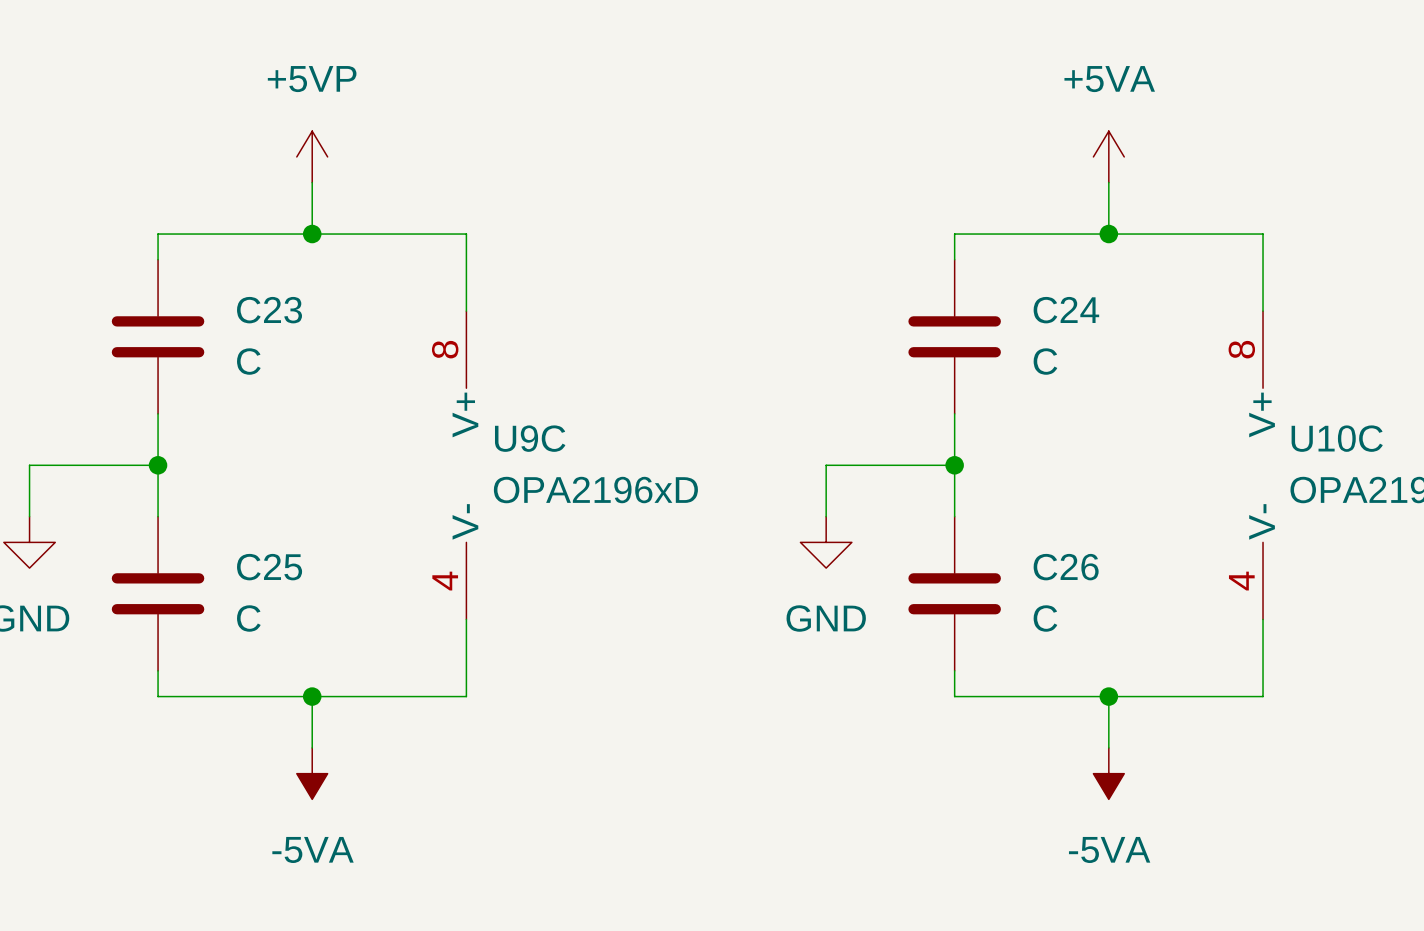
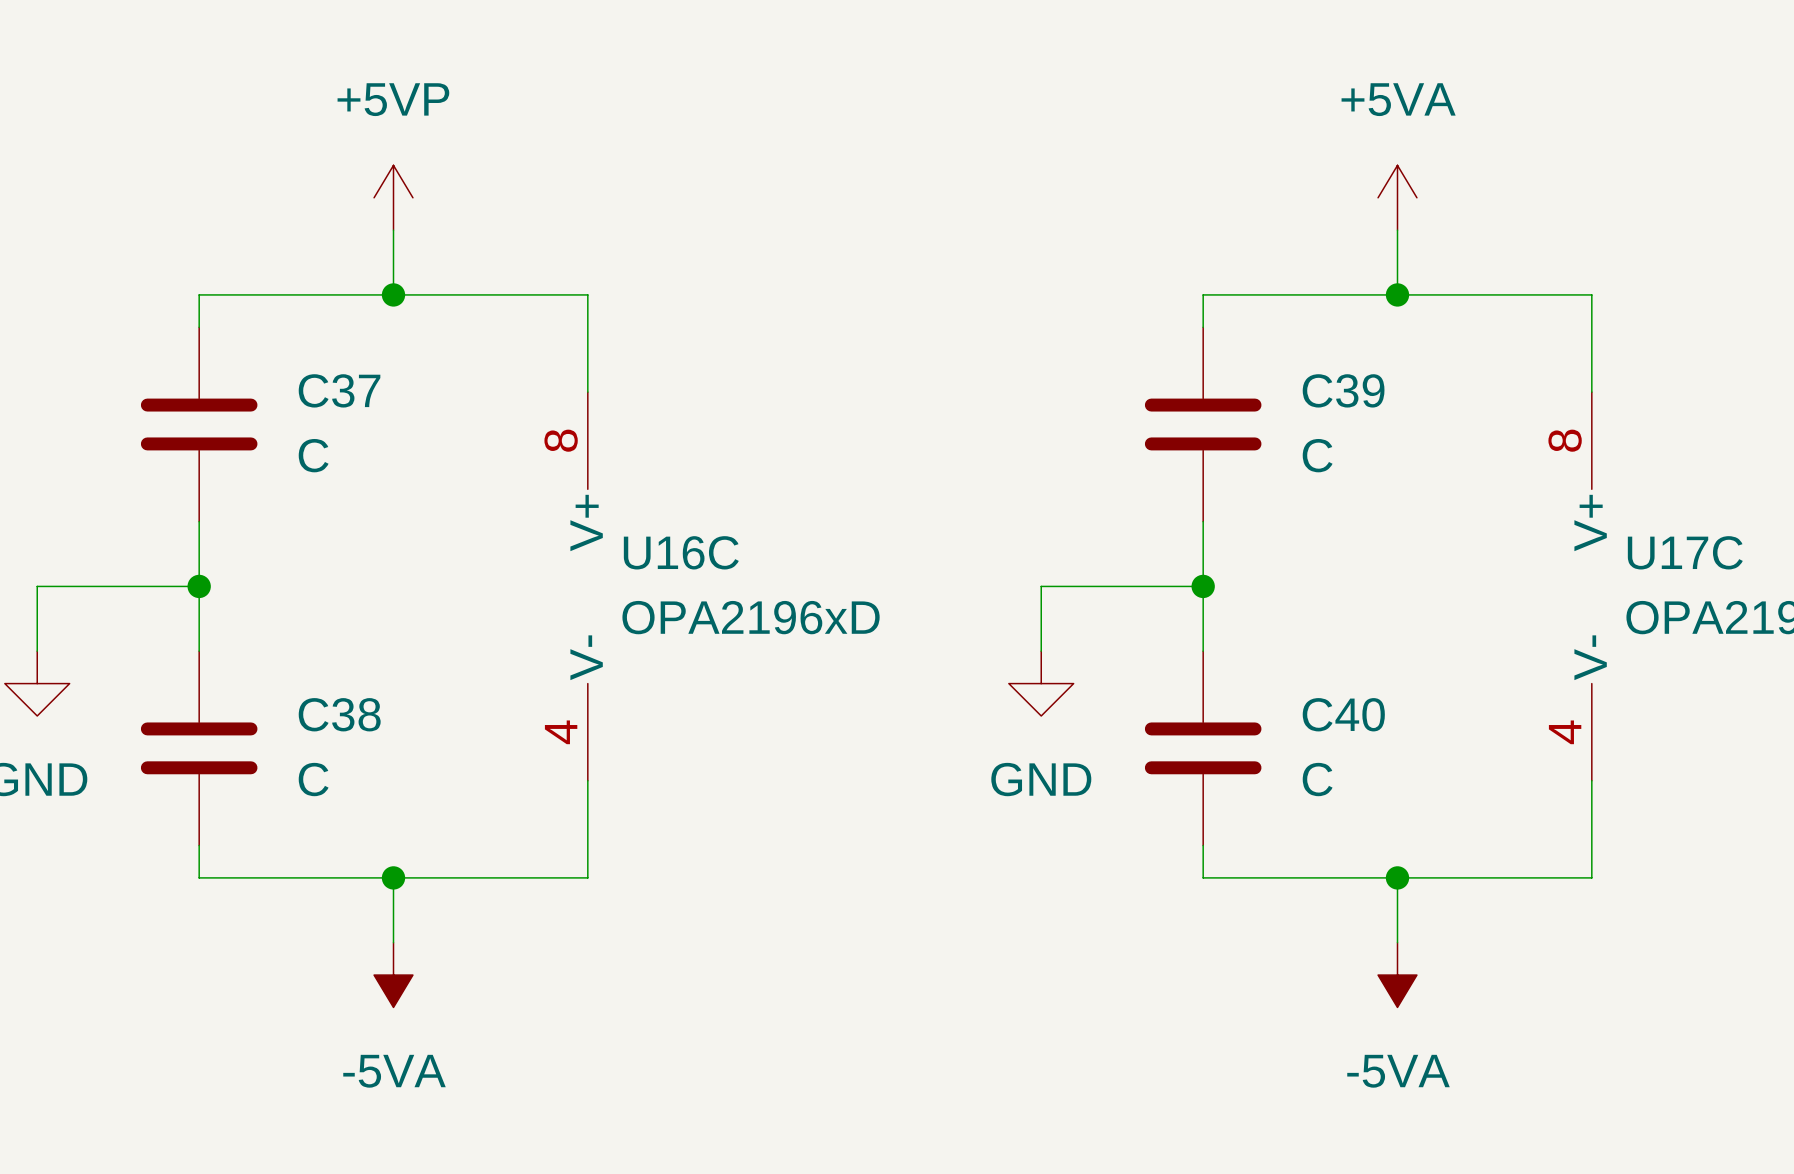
C23 name: C23 (269, 310) -> C37 (339, 390)
C24 name: C24 (1066, 310) -> C39 (1343, 390)
U9C name: U9C (530, 438) -> U16C (681, 552)
U10C name: U10C (1337, 438) -> U17C (1685, 552)
C25 name: C25 (269, 567) -> C38 (339, 714)
C26 name: C26 (1066, 567) -> C40 (1343, 714)

